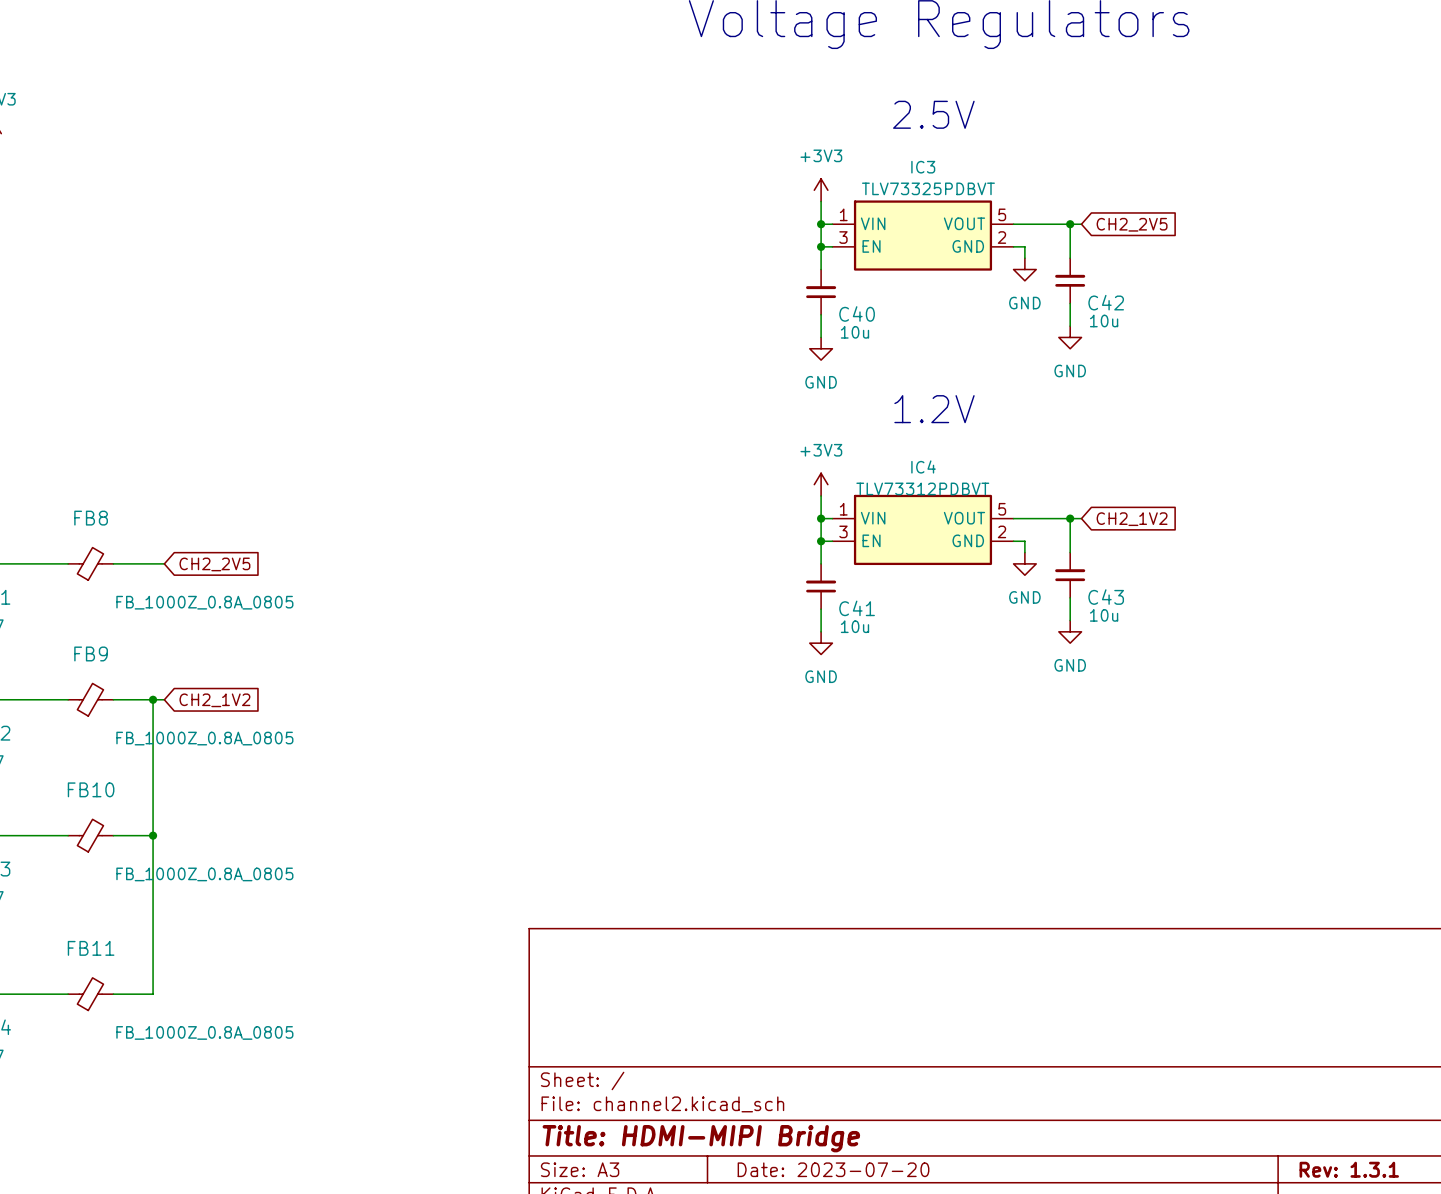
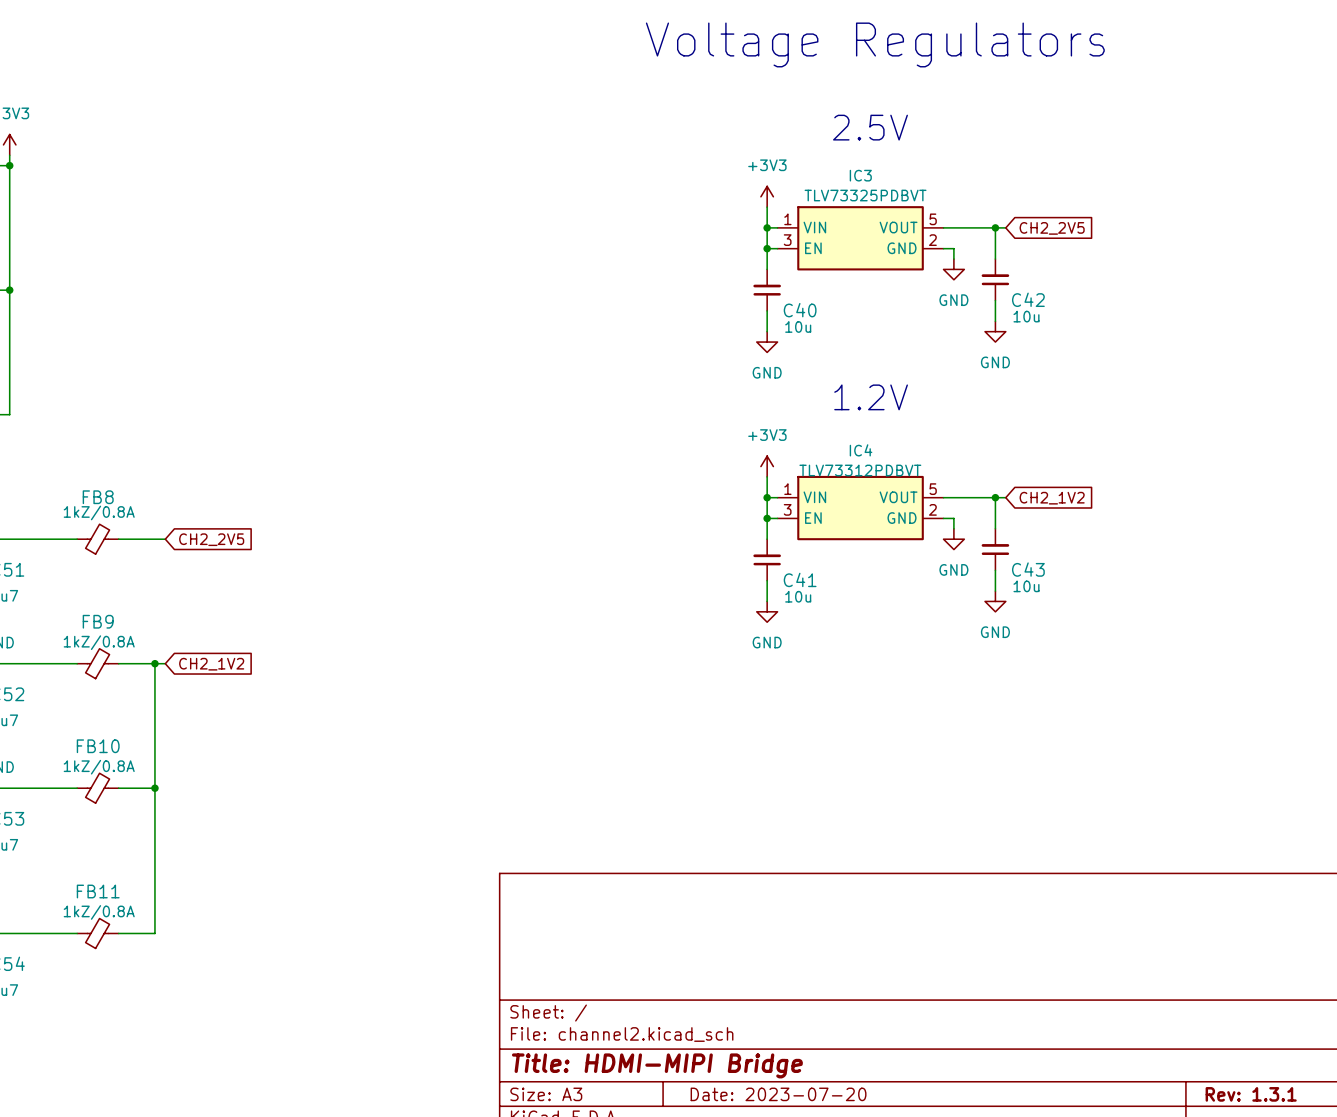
FB8 text: none -> 1kZ/0.8A (99, 512)
FB8 value: FB_1000Z_0.8A_0805 (204, 602) -> none
FB9 text: none -> 1kZ/0.8A (99, 642)
FB9 value: FB_1000Z_0.8A_0805 (204, 738) -> none
FB10 text: none -> 1kZ/0.8A (99, 767)
FB10 value: FB_1000Z_0.8A_0805 (204, 874) -> none
FB11 text: none -> 1kZ/0.8A (99, 912)
FB11 value: FB_1000Z_0.8A_0805 (204, 1032) -> none

